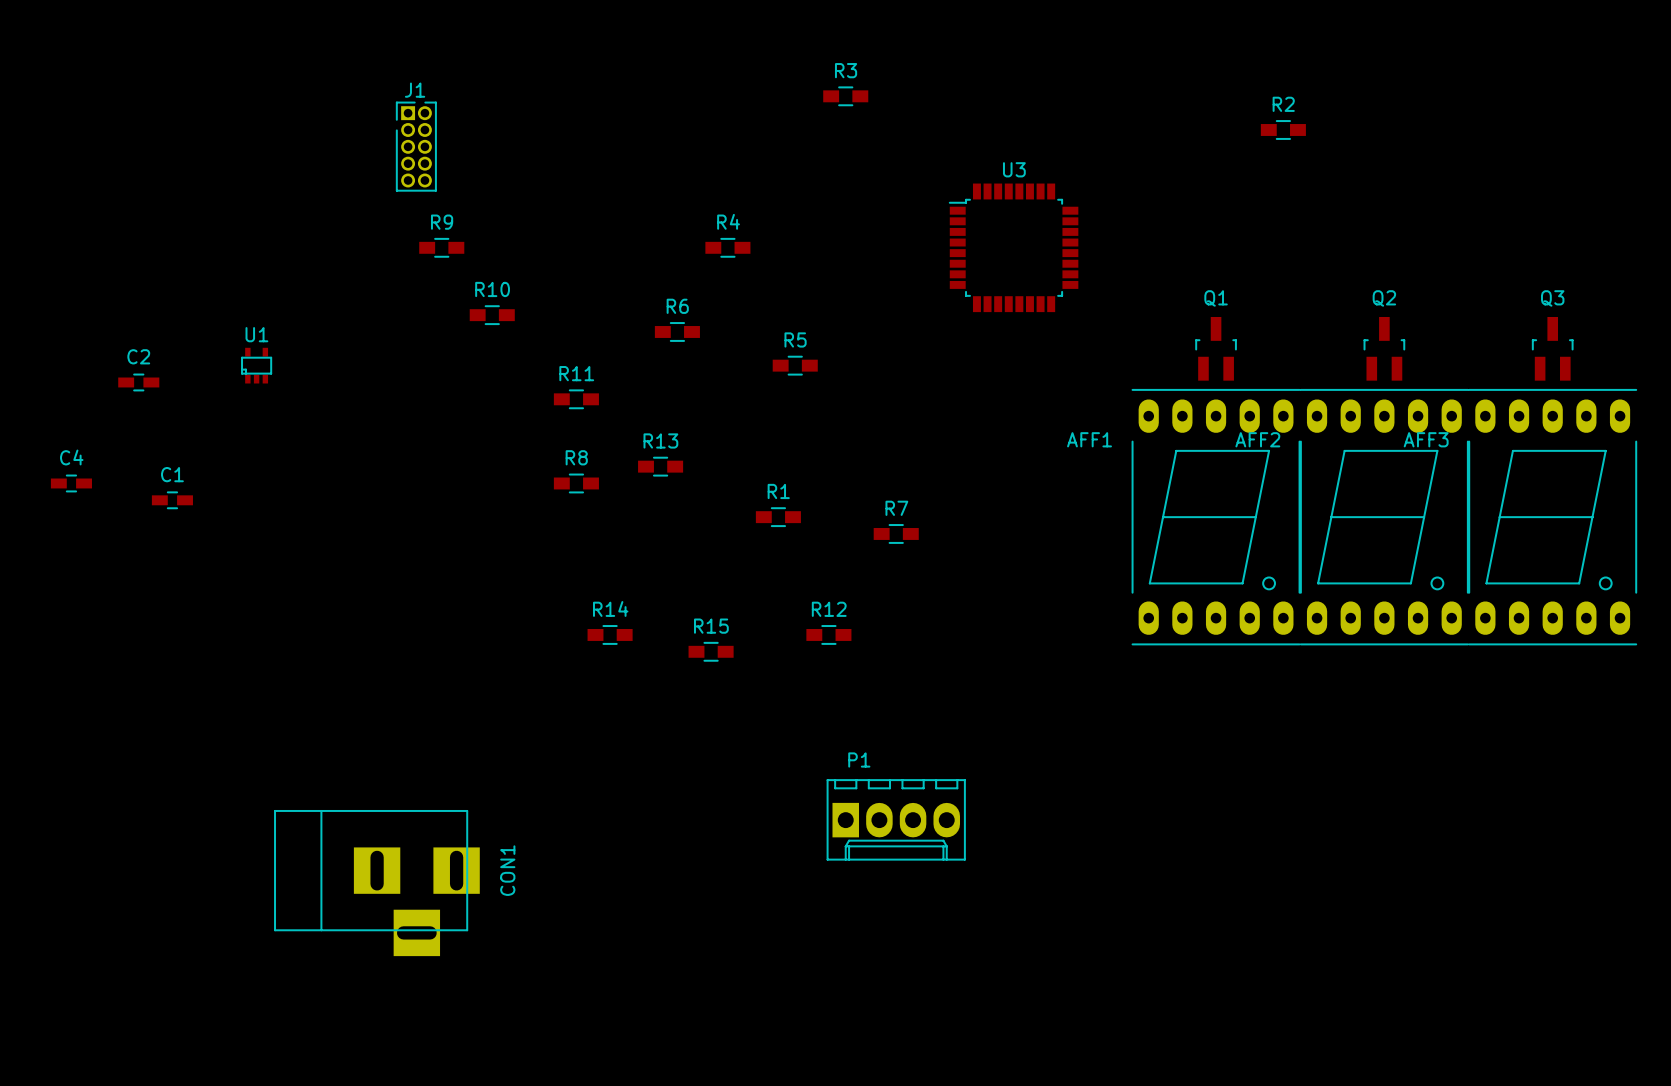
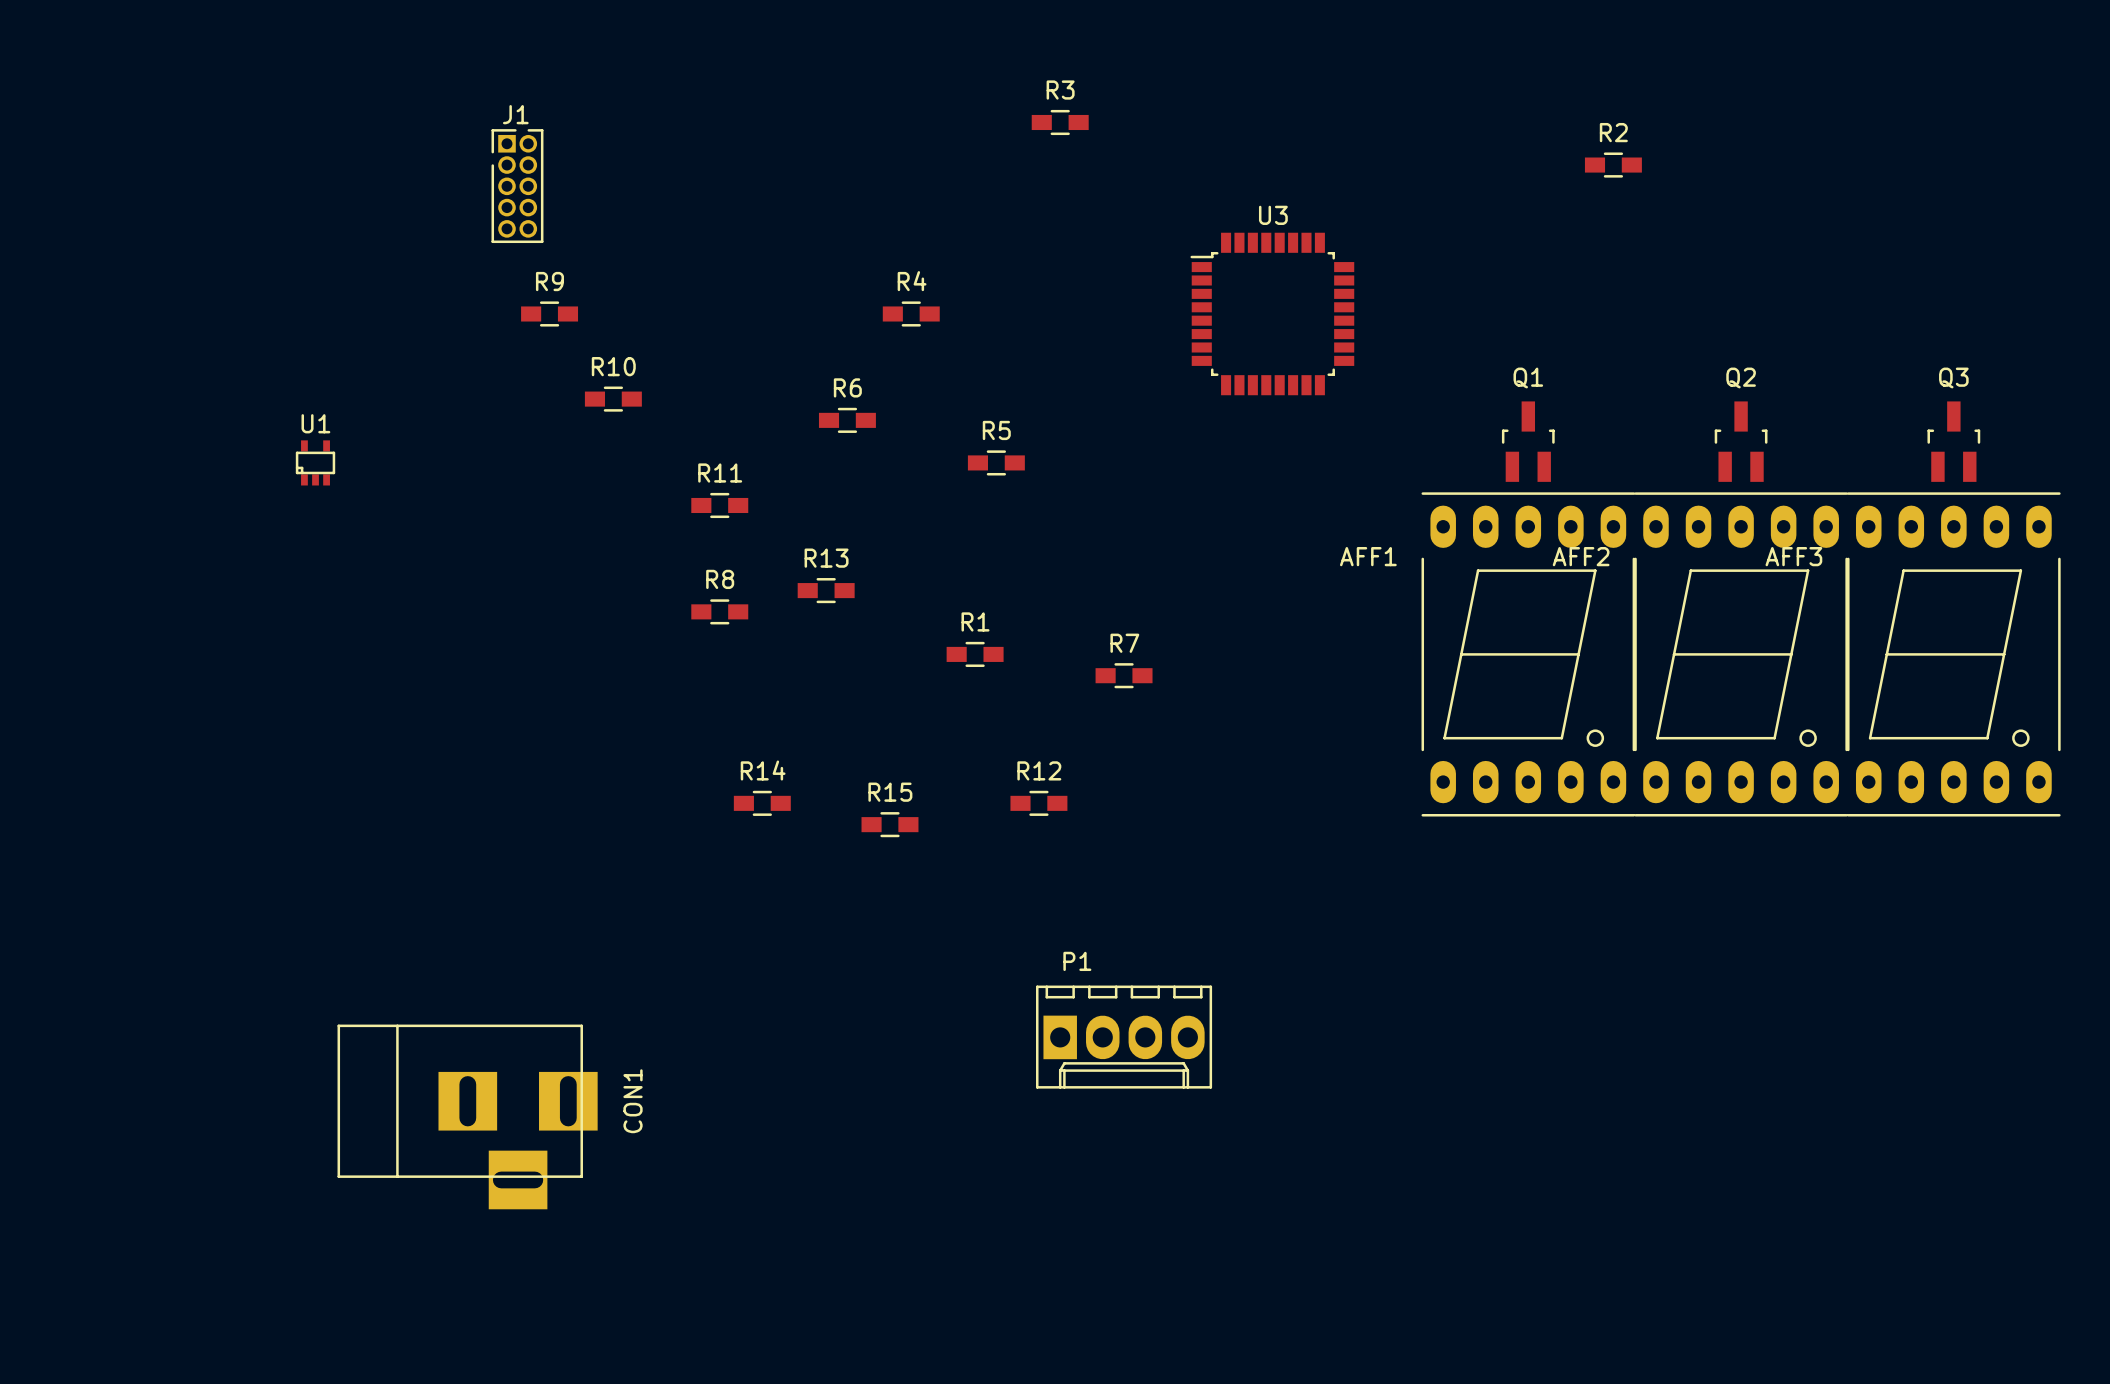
C2: (138, 382) -> none
C4: (71, 483) -> none
C1: (172, 500) -> none

